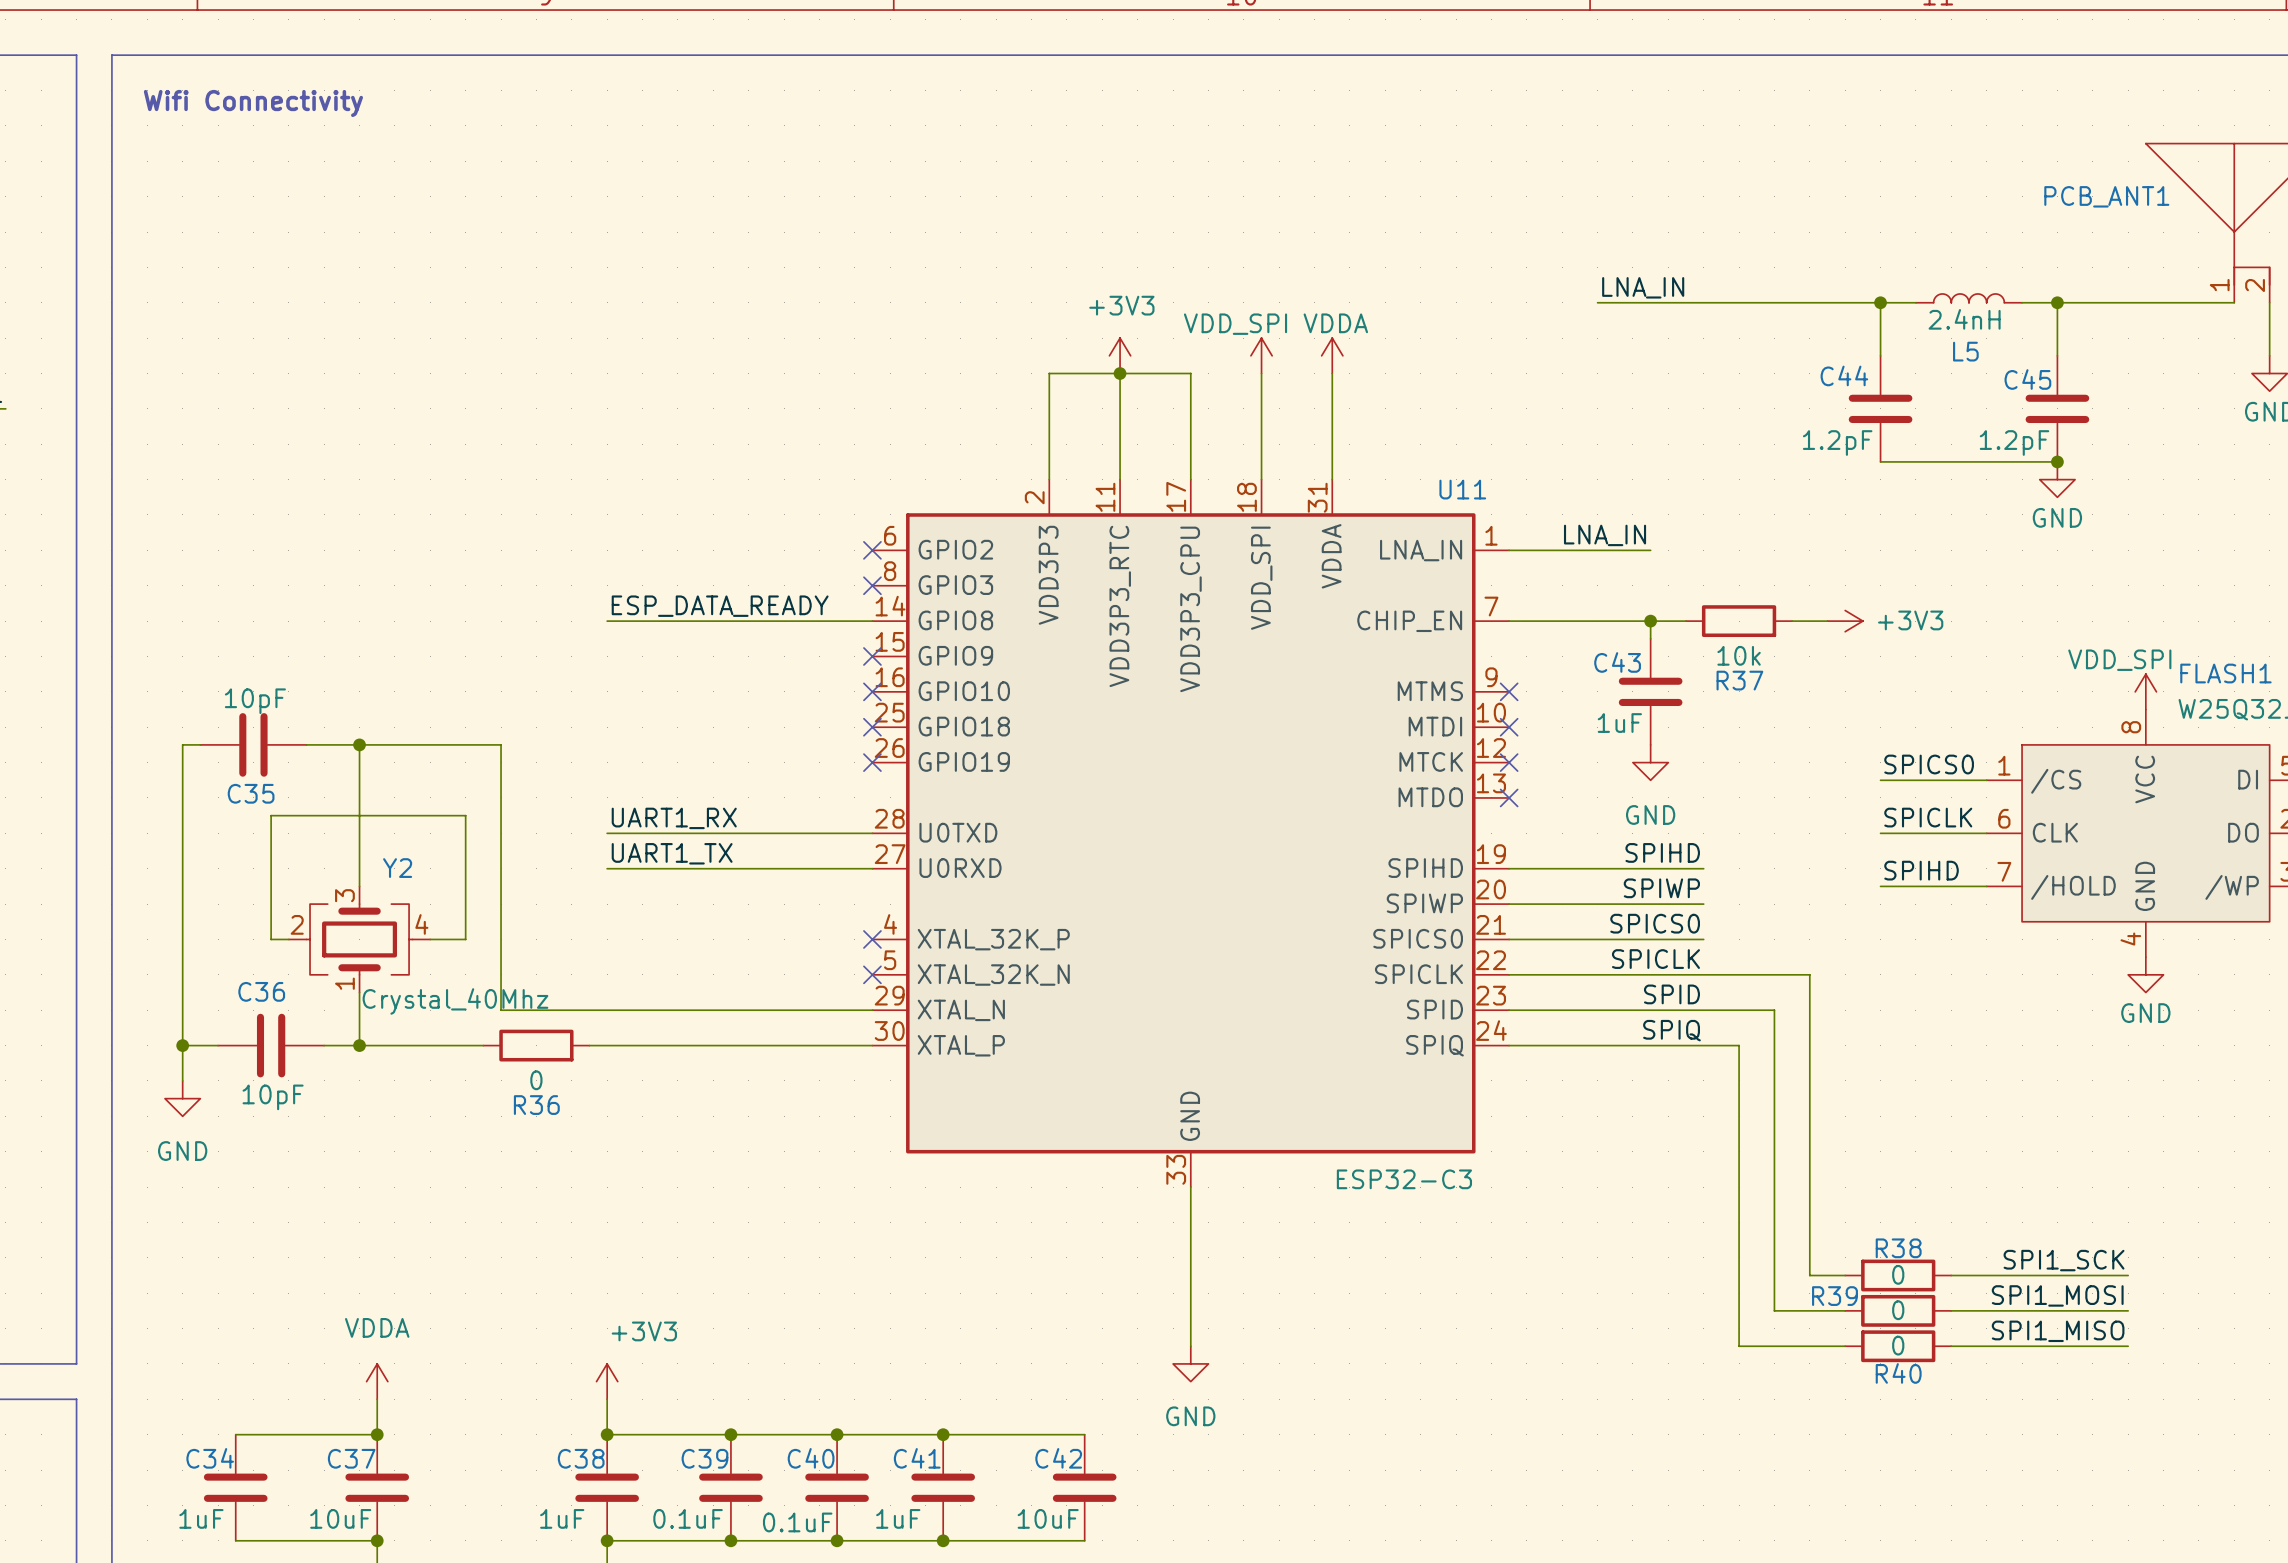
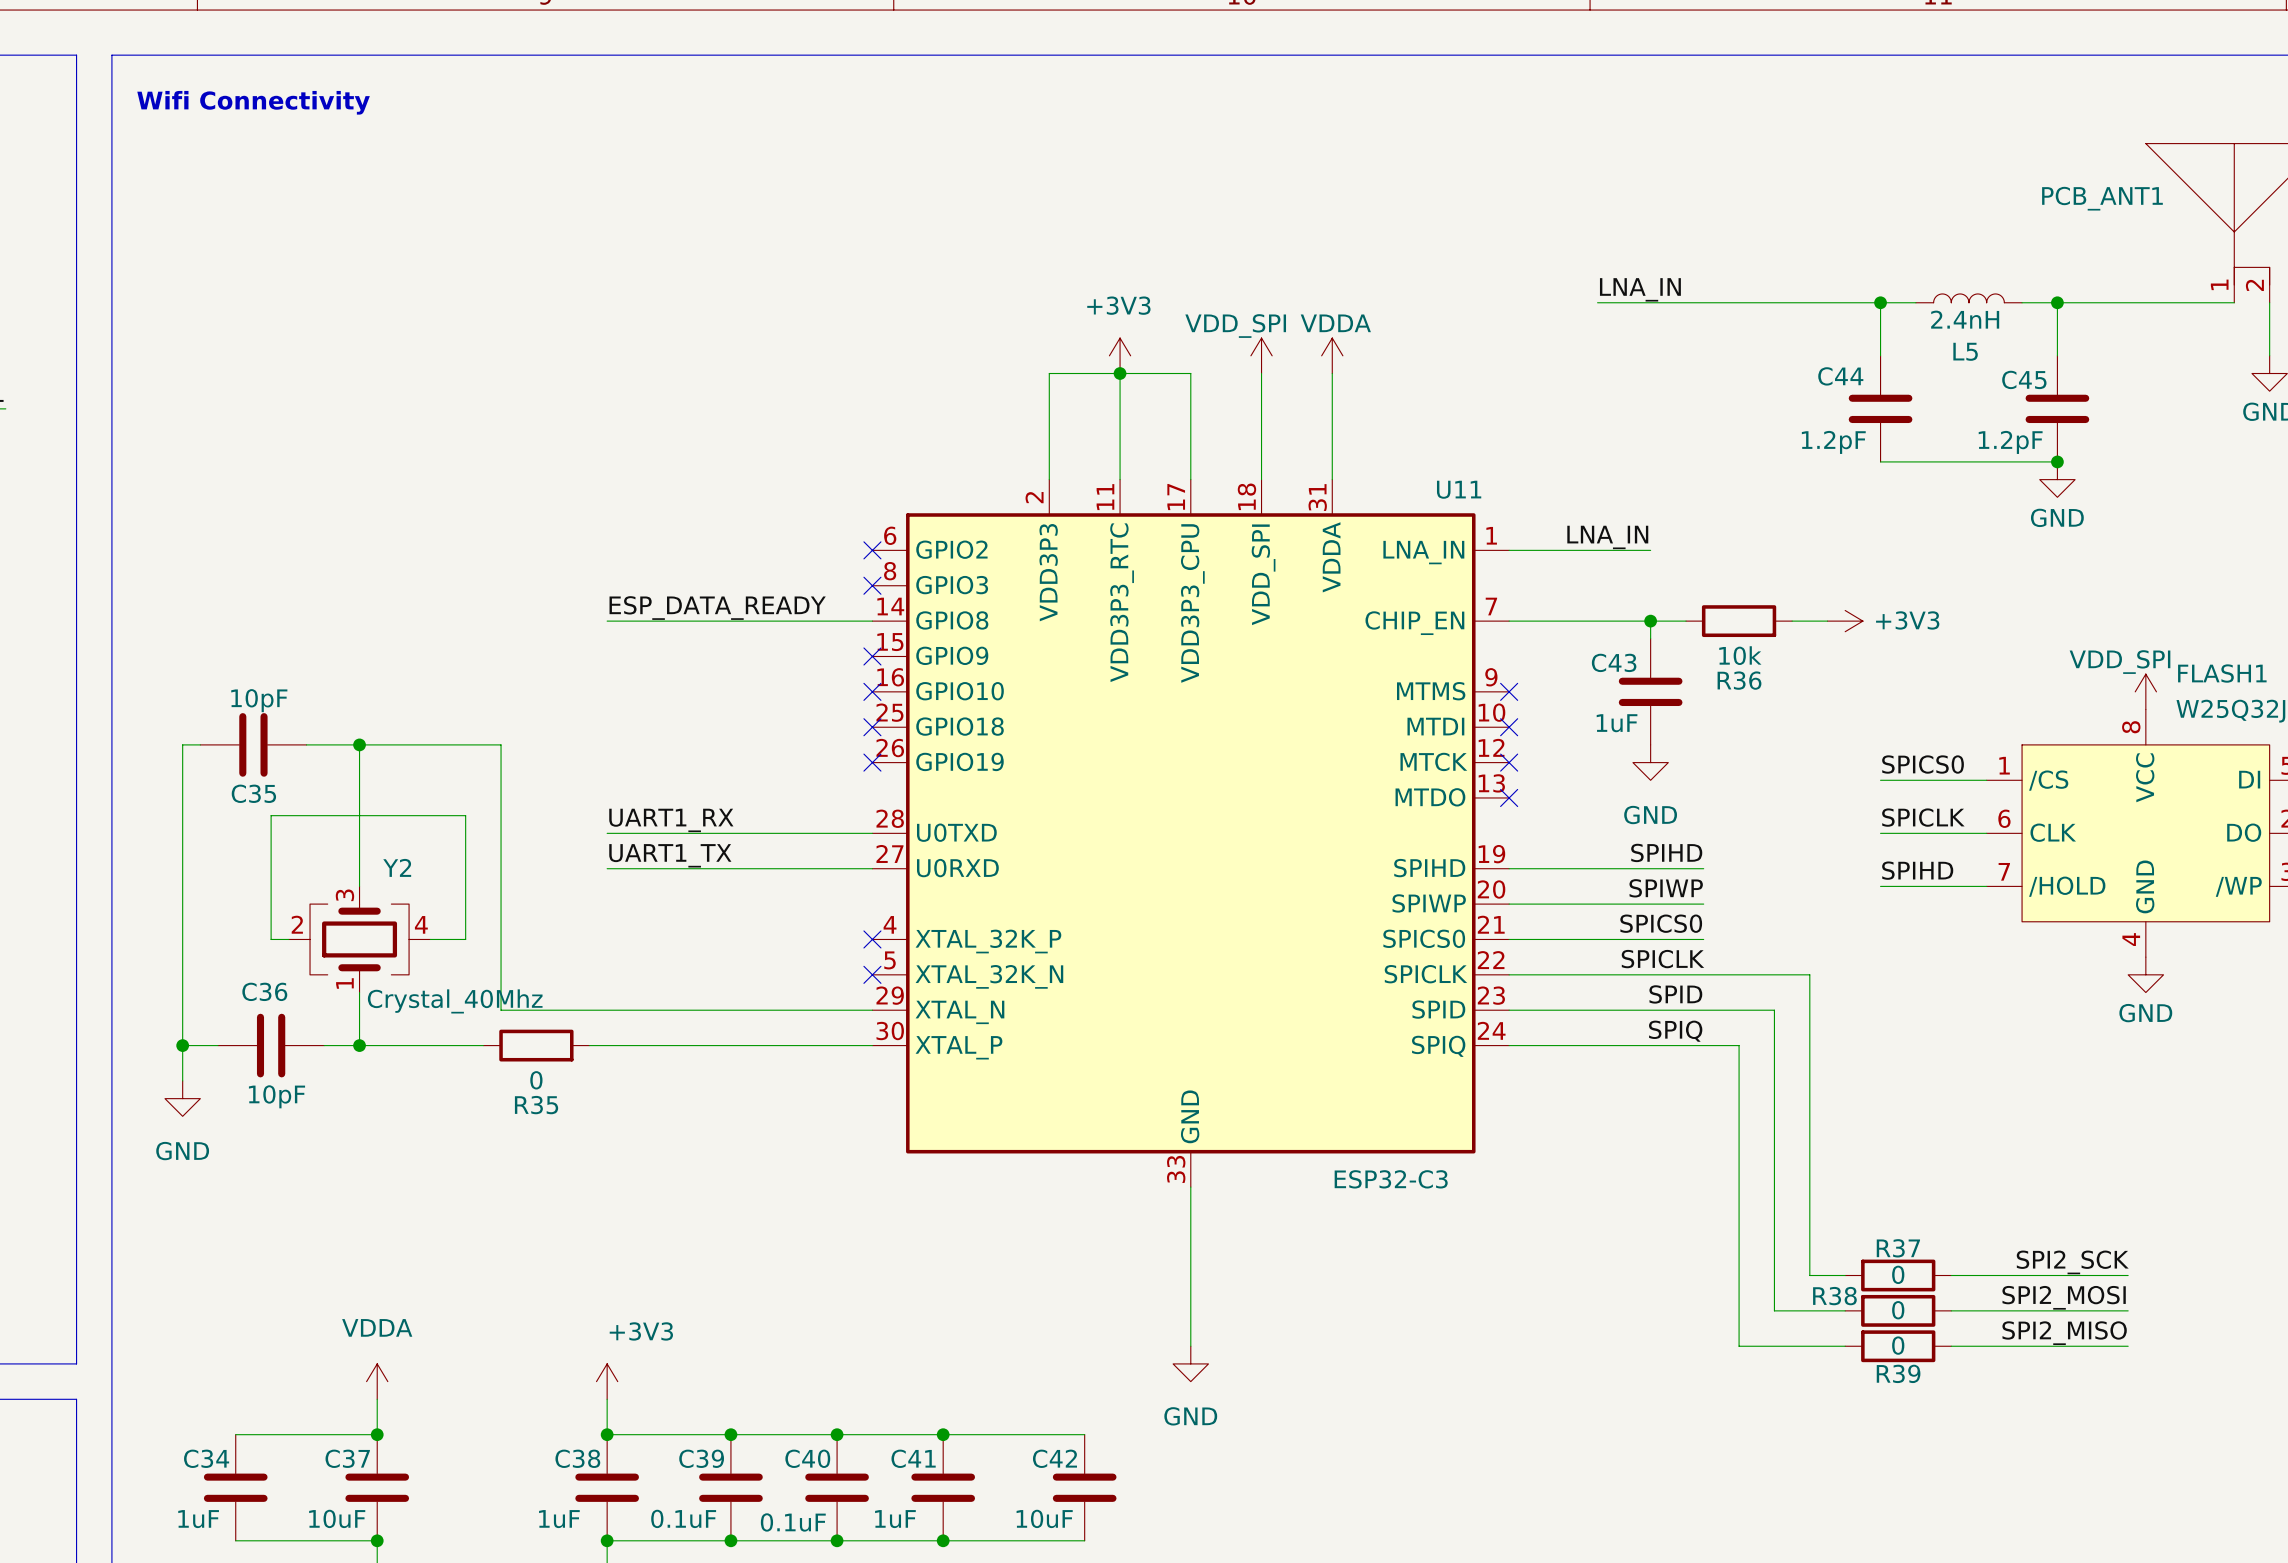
R37 name: R37 (1739, 680) -> R36 (1739, 680)
R36 name: R36 (536, 1105) -> R35 (536, 1105)
R38 name: R38 (1898, 1248) -> R37 (1898, 1248)
label: SPI1_SCK (2064, 1260) -> SPI2_SCK (2072, 1262)
label: SPI1_MOSI (2057, 1295) -> SPI2_MOSI (2064, 1297)
R39 name: R39 (1834, 1296) -> R38 (1834, 1296)
label: SPI1_MISO (2058, 1331) -> SPI2_MISO (2064, 1333)
R40 name: R40 (1898, 1373) -> R39 (1898, 1373)

